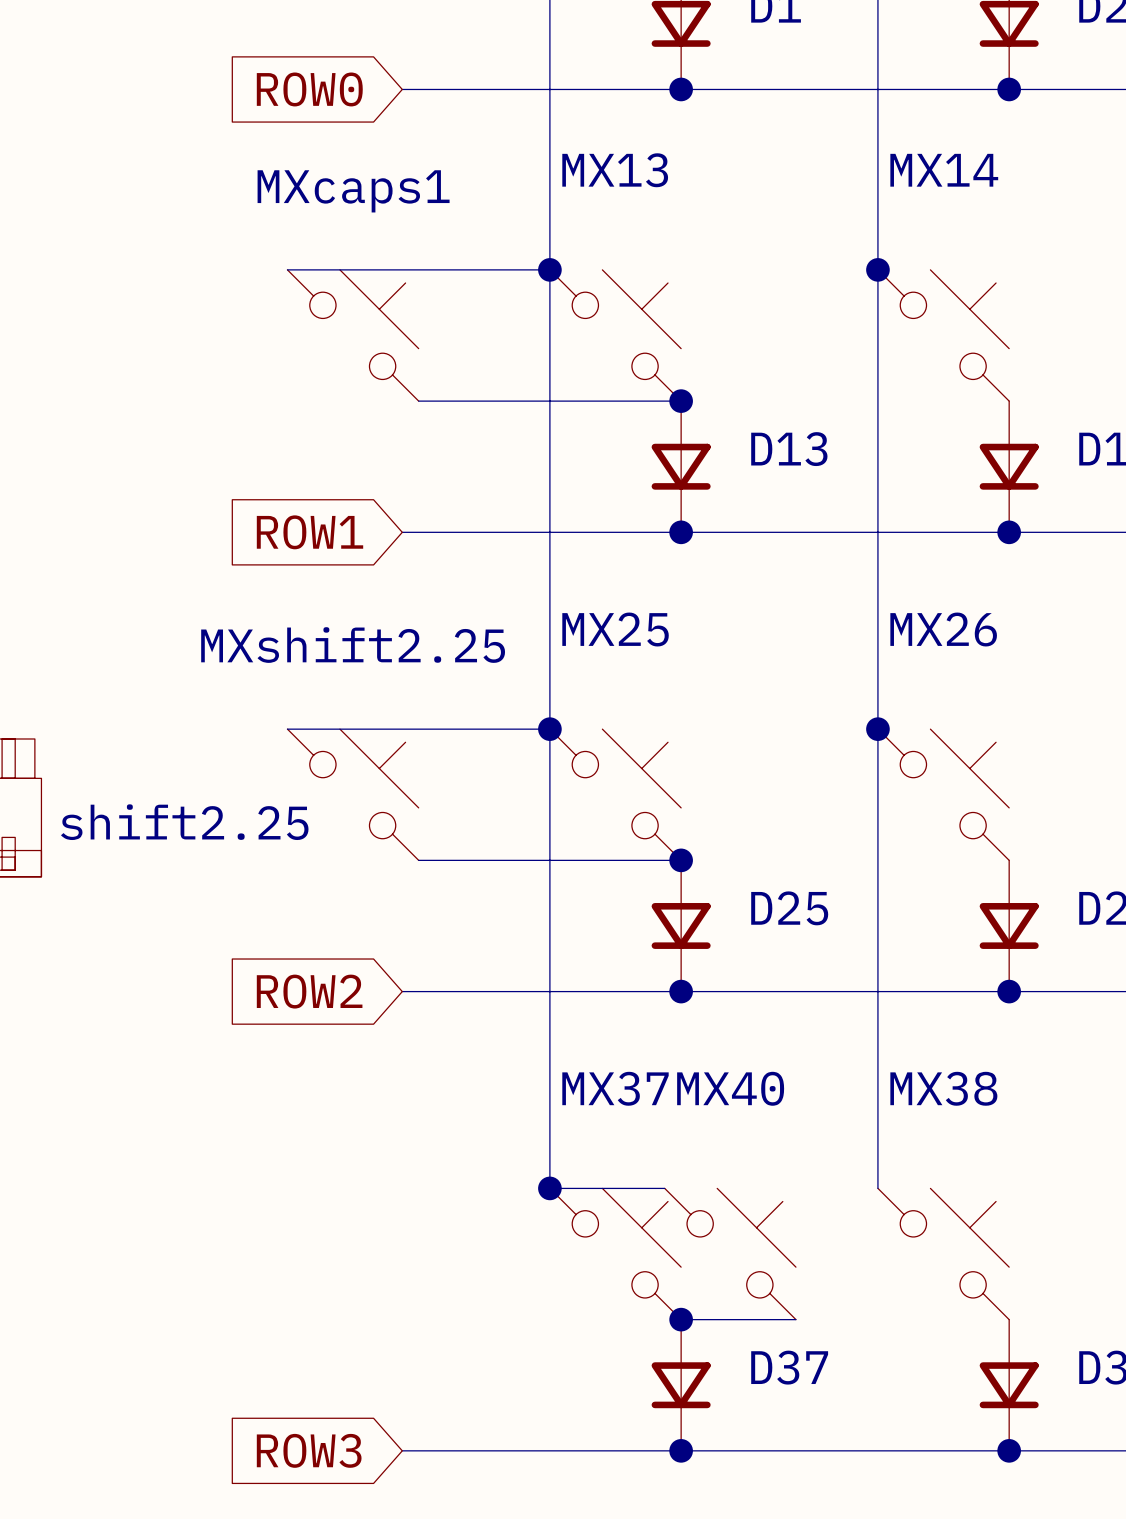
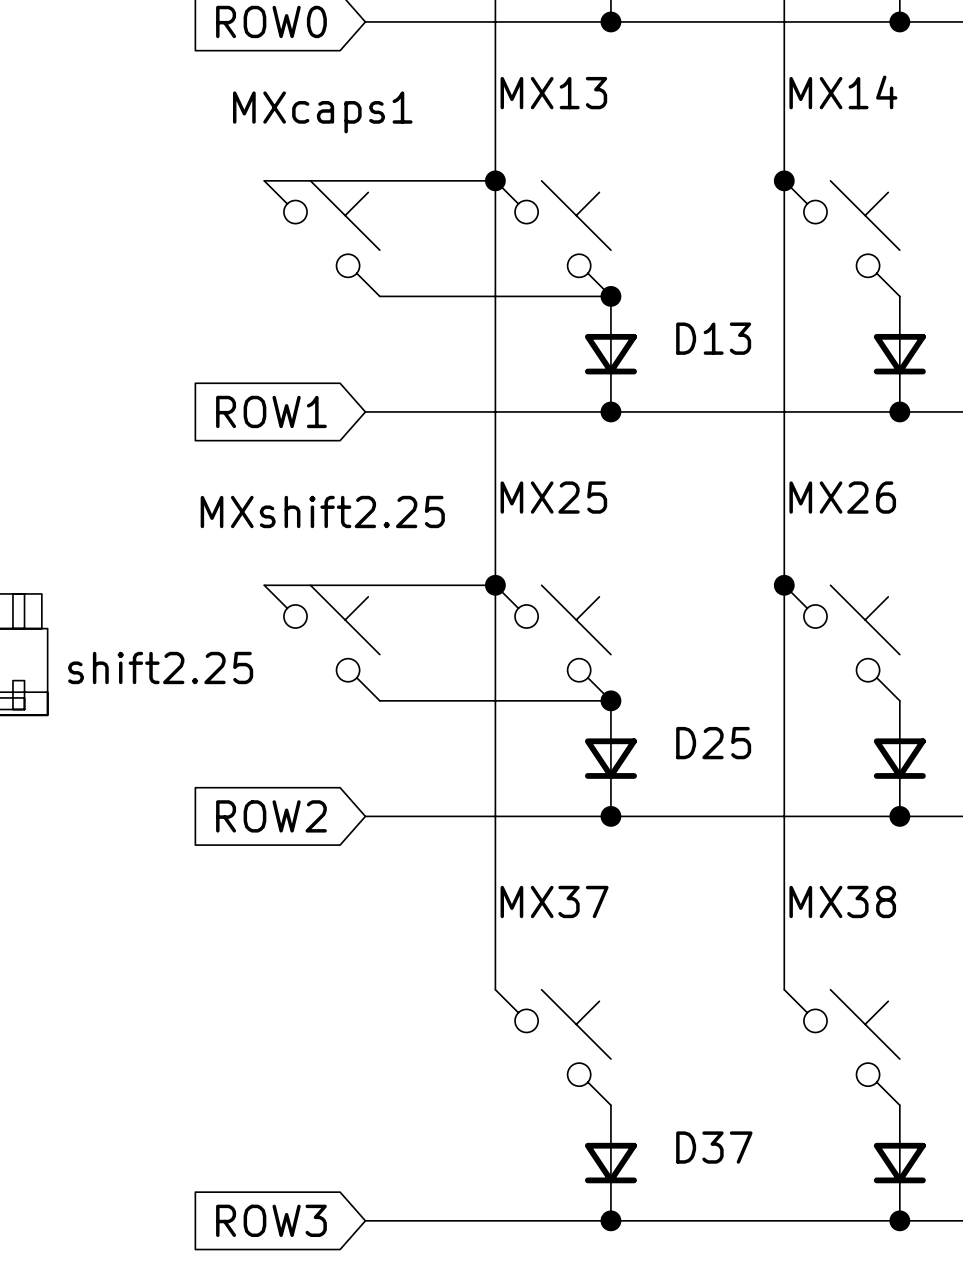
wire: (549, 1188) (664, 1188) -> none
junction: (549, 1188) -> none
MX40: (730, 1254) -> none
wire: (681, 1319) (795, 1319) -> none
junction: (681, 1319) -> none

